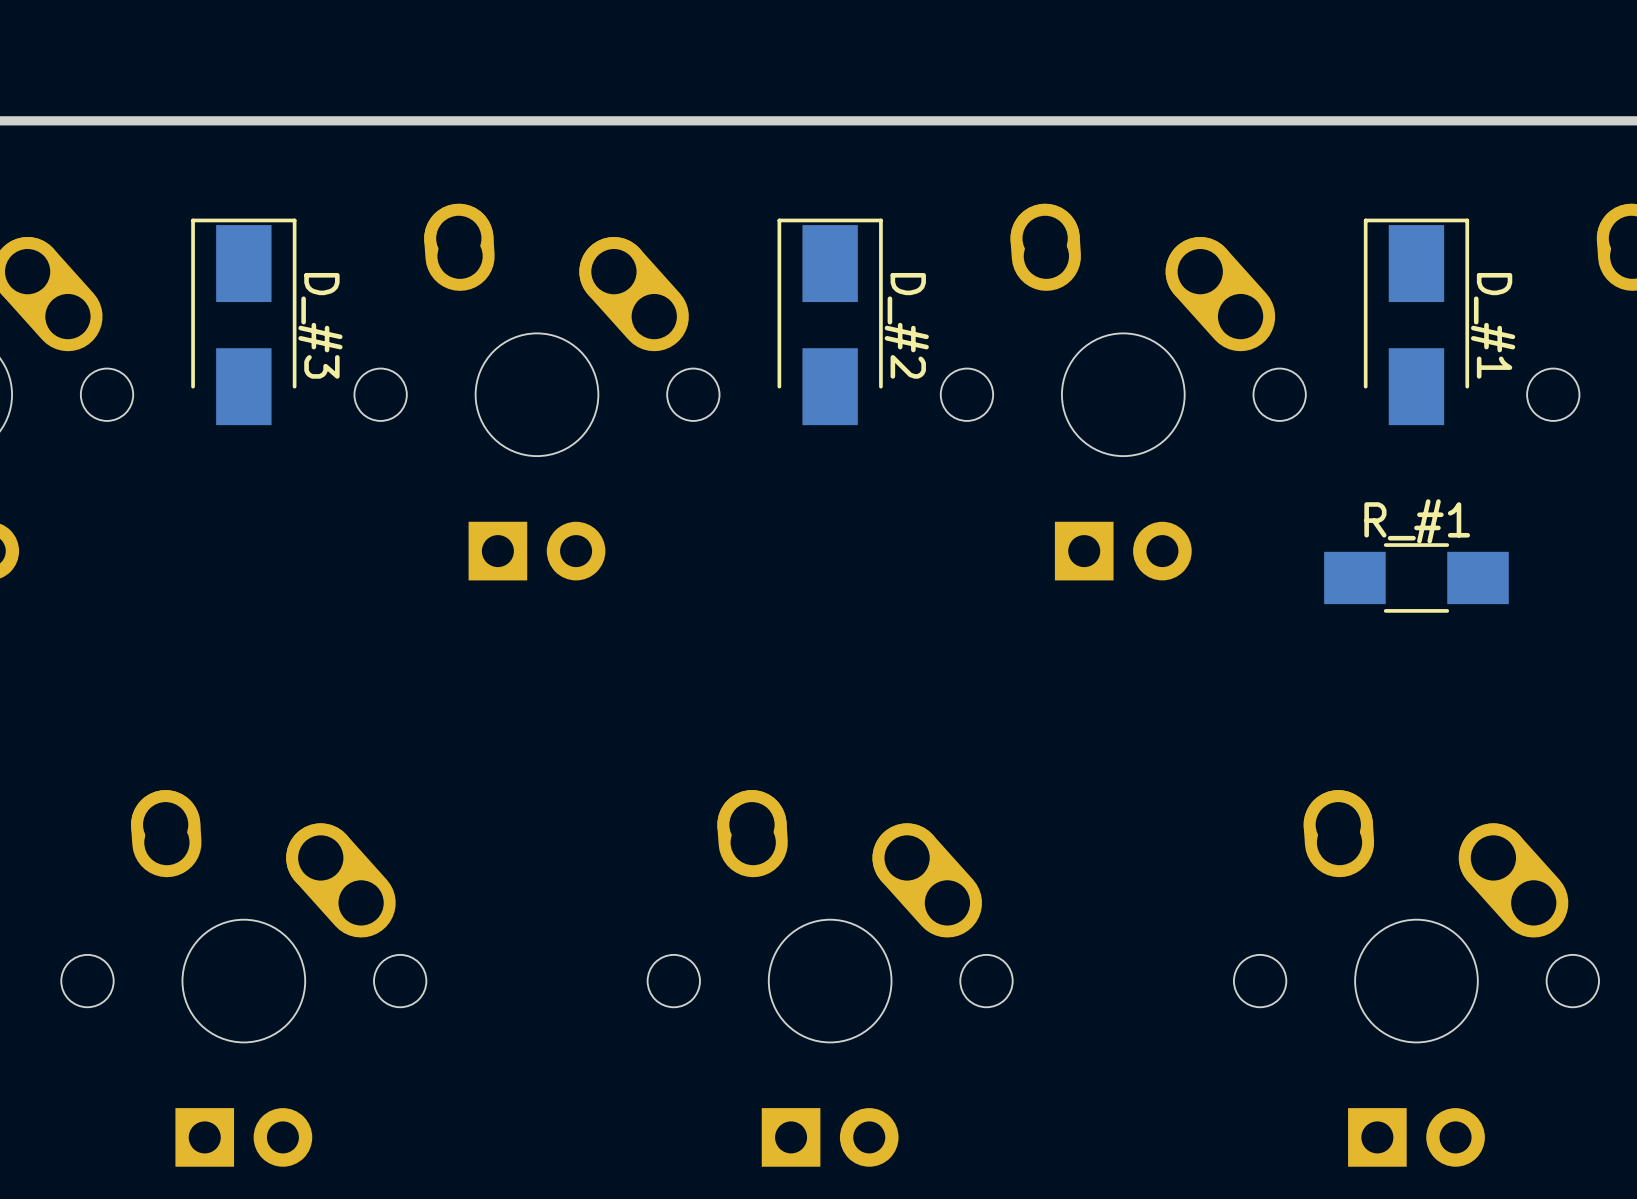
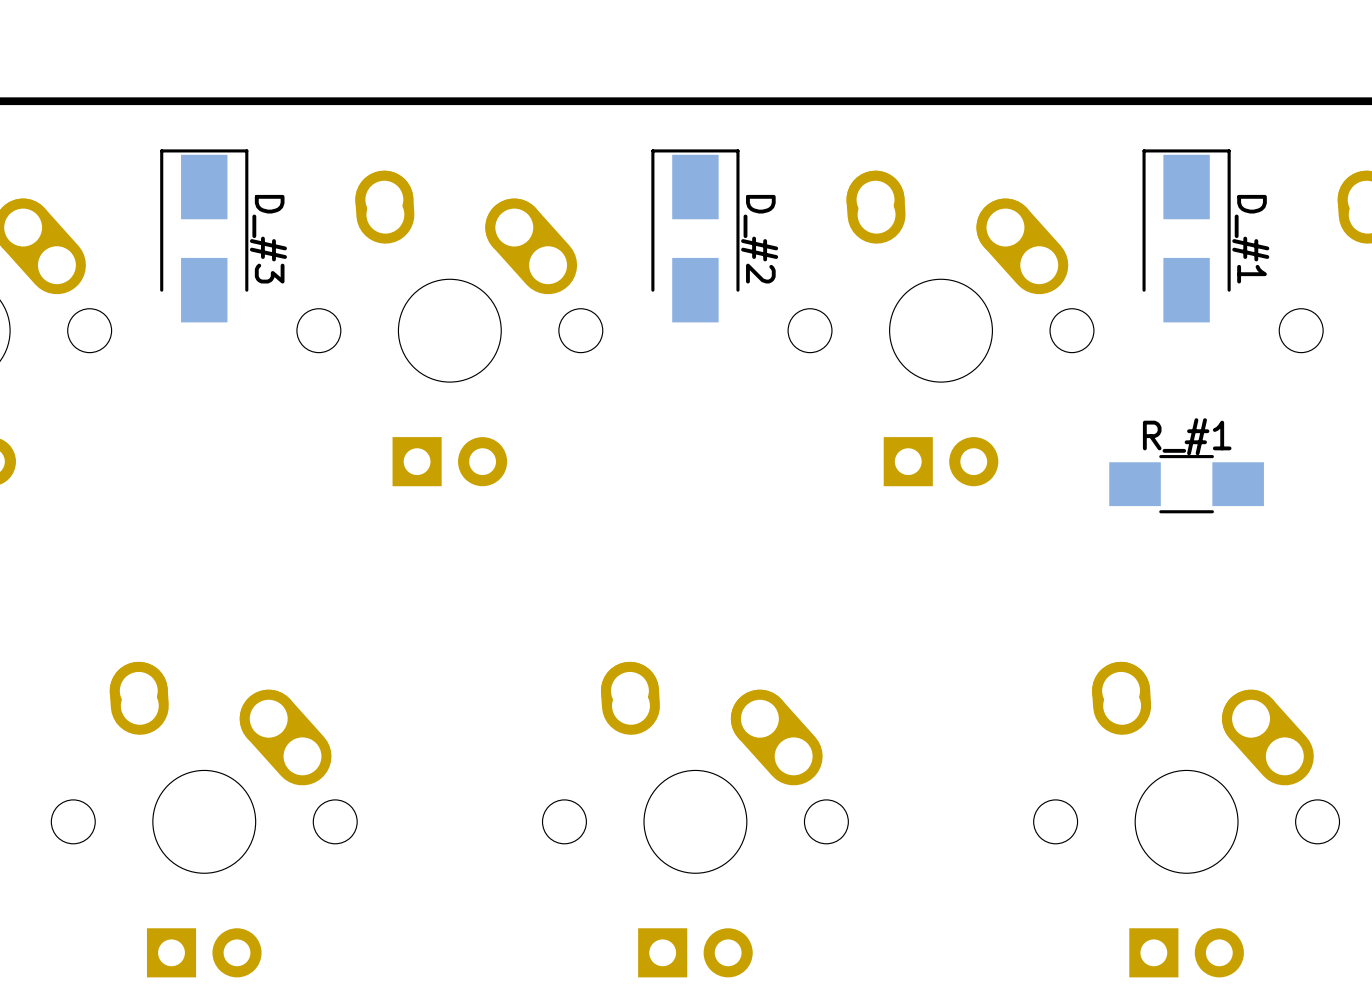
D_#3 position: (243, 321) -> (204, 235)
D_#2 position: (830, 321) -> (695, 235)
D_#1 position: (1416, 321) -> (1186, 235)

